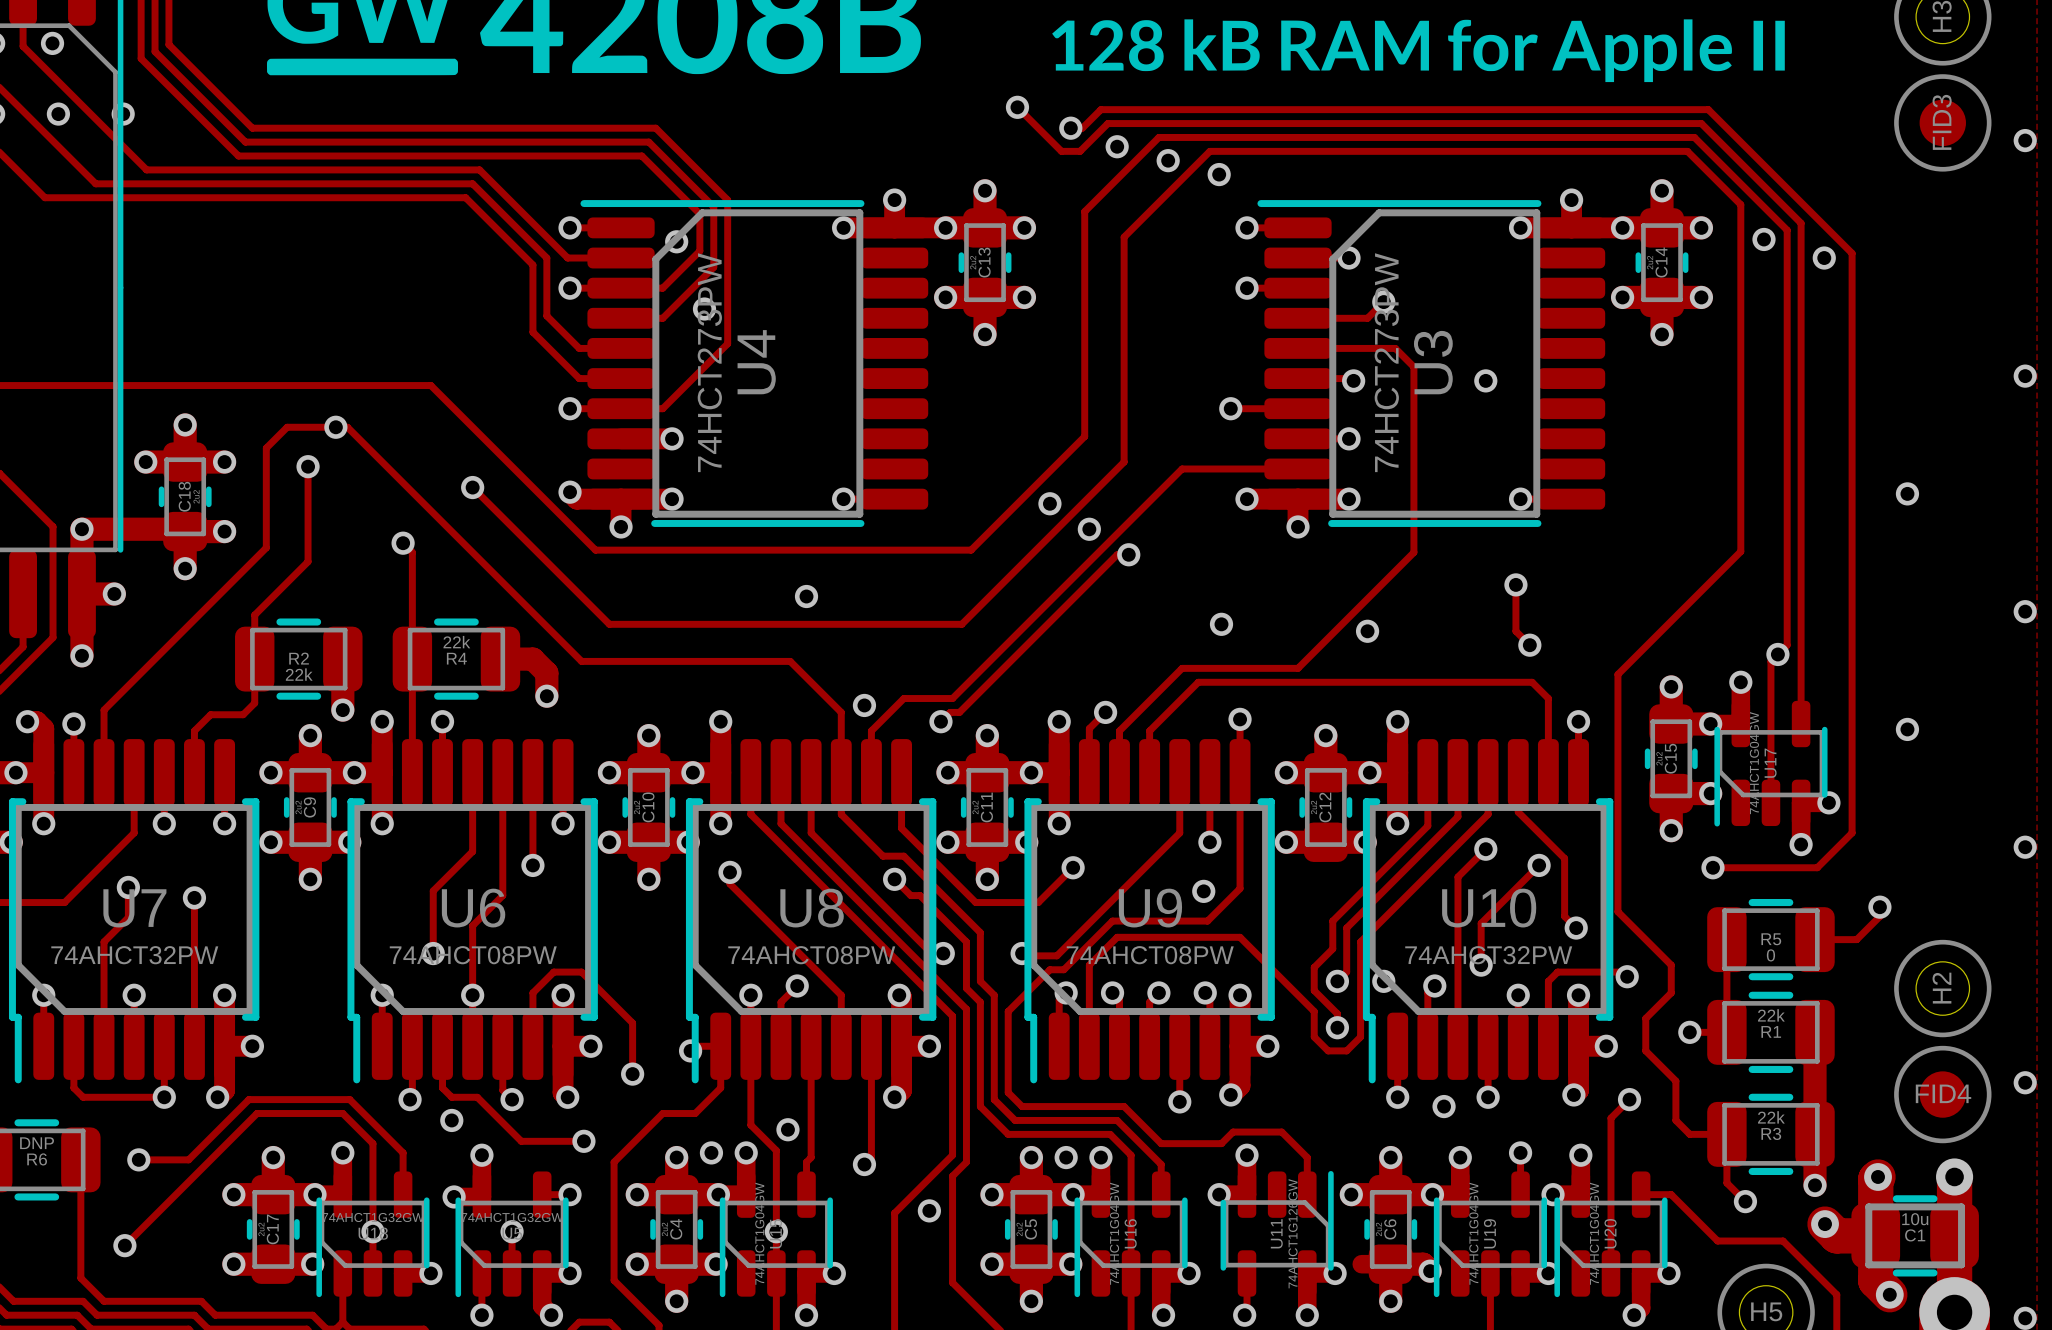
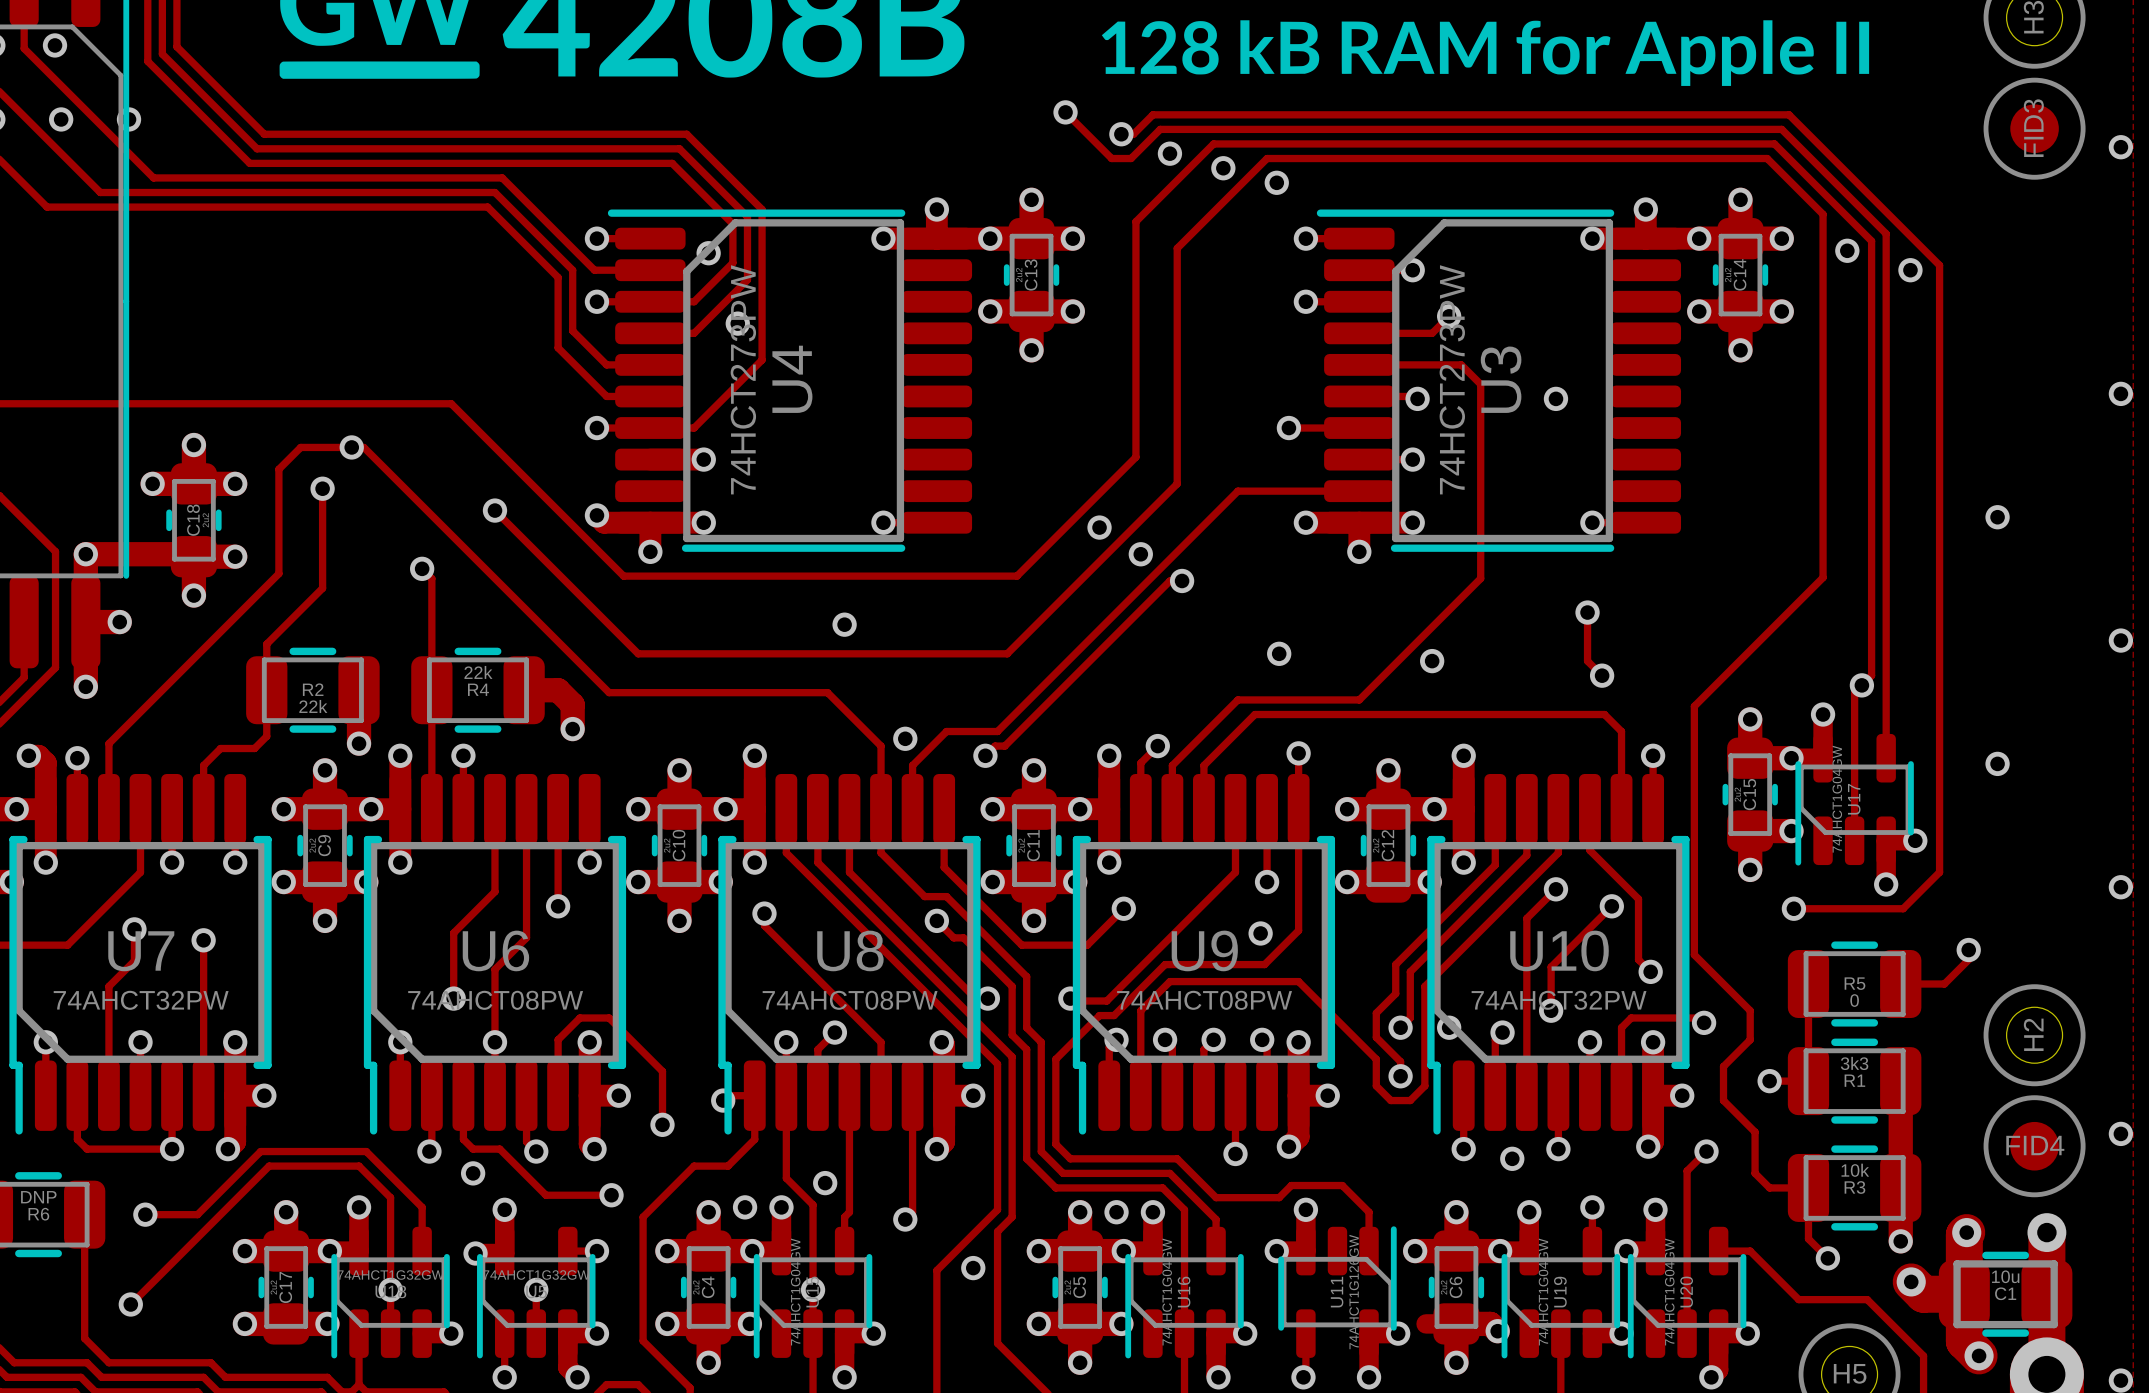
R1 value: 22k (1771, 1015) -> 3k3 (1854, 1063)
R3 value: 22k (1771, 1117) -> 10k (1855, 1170)

